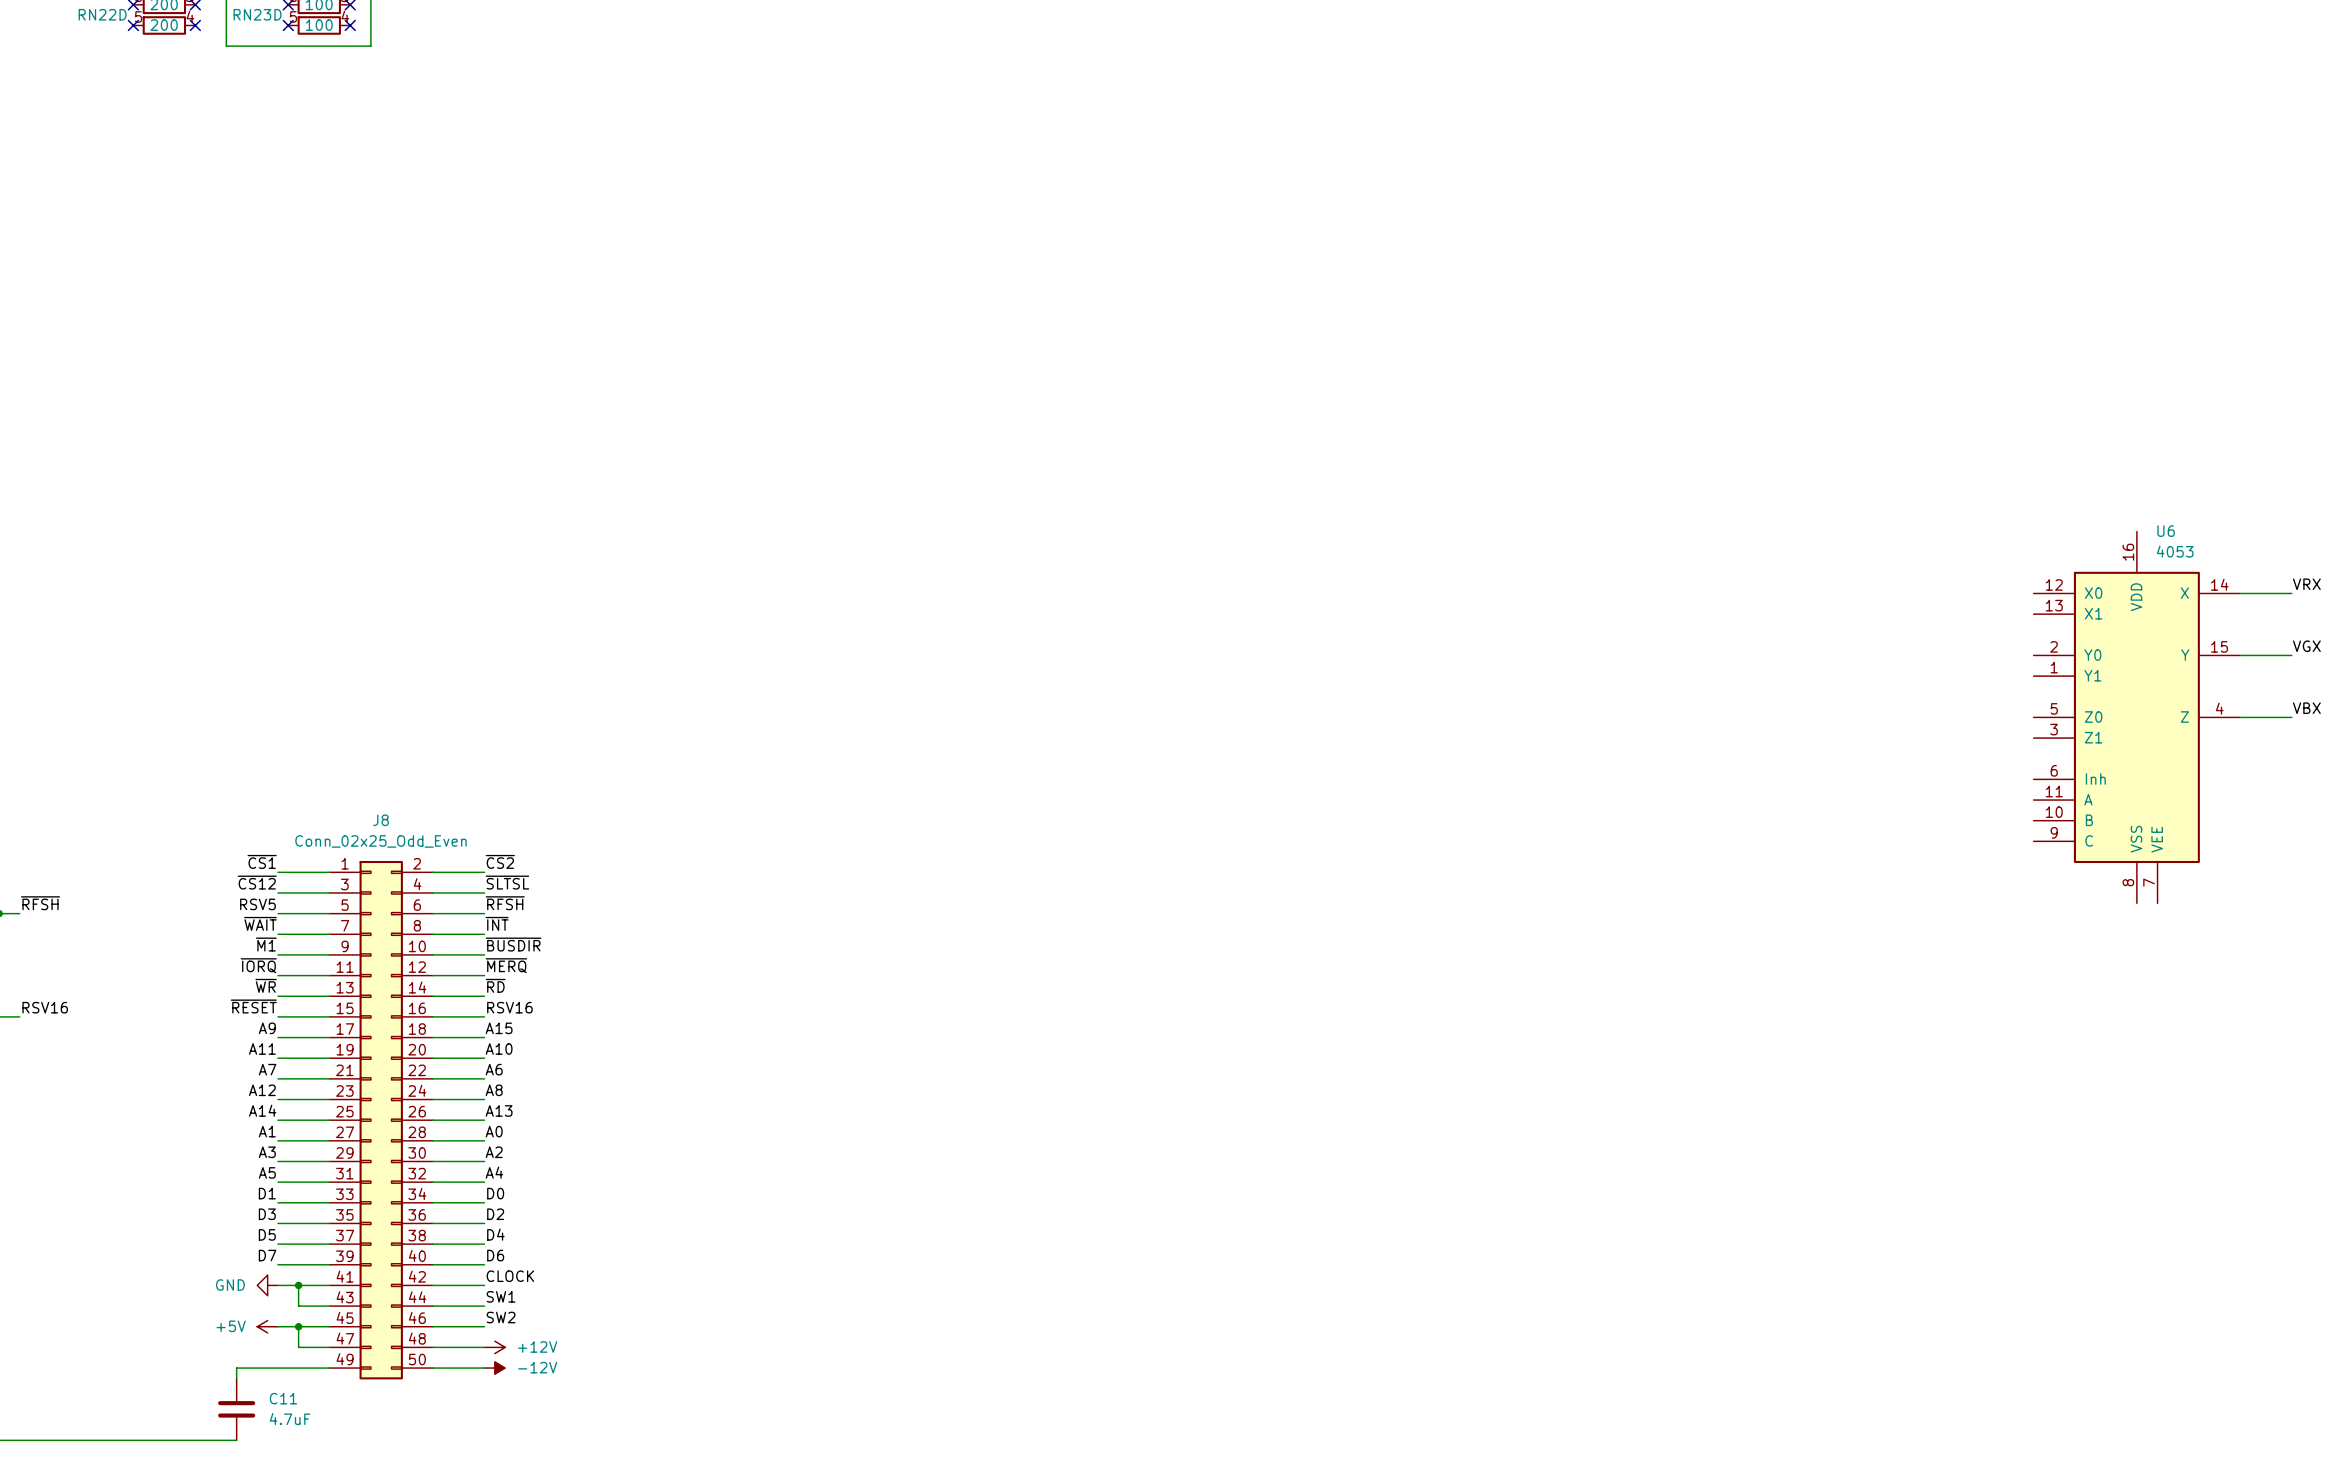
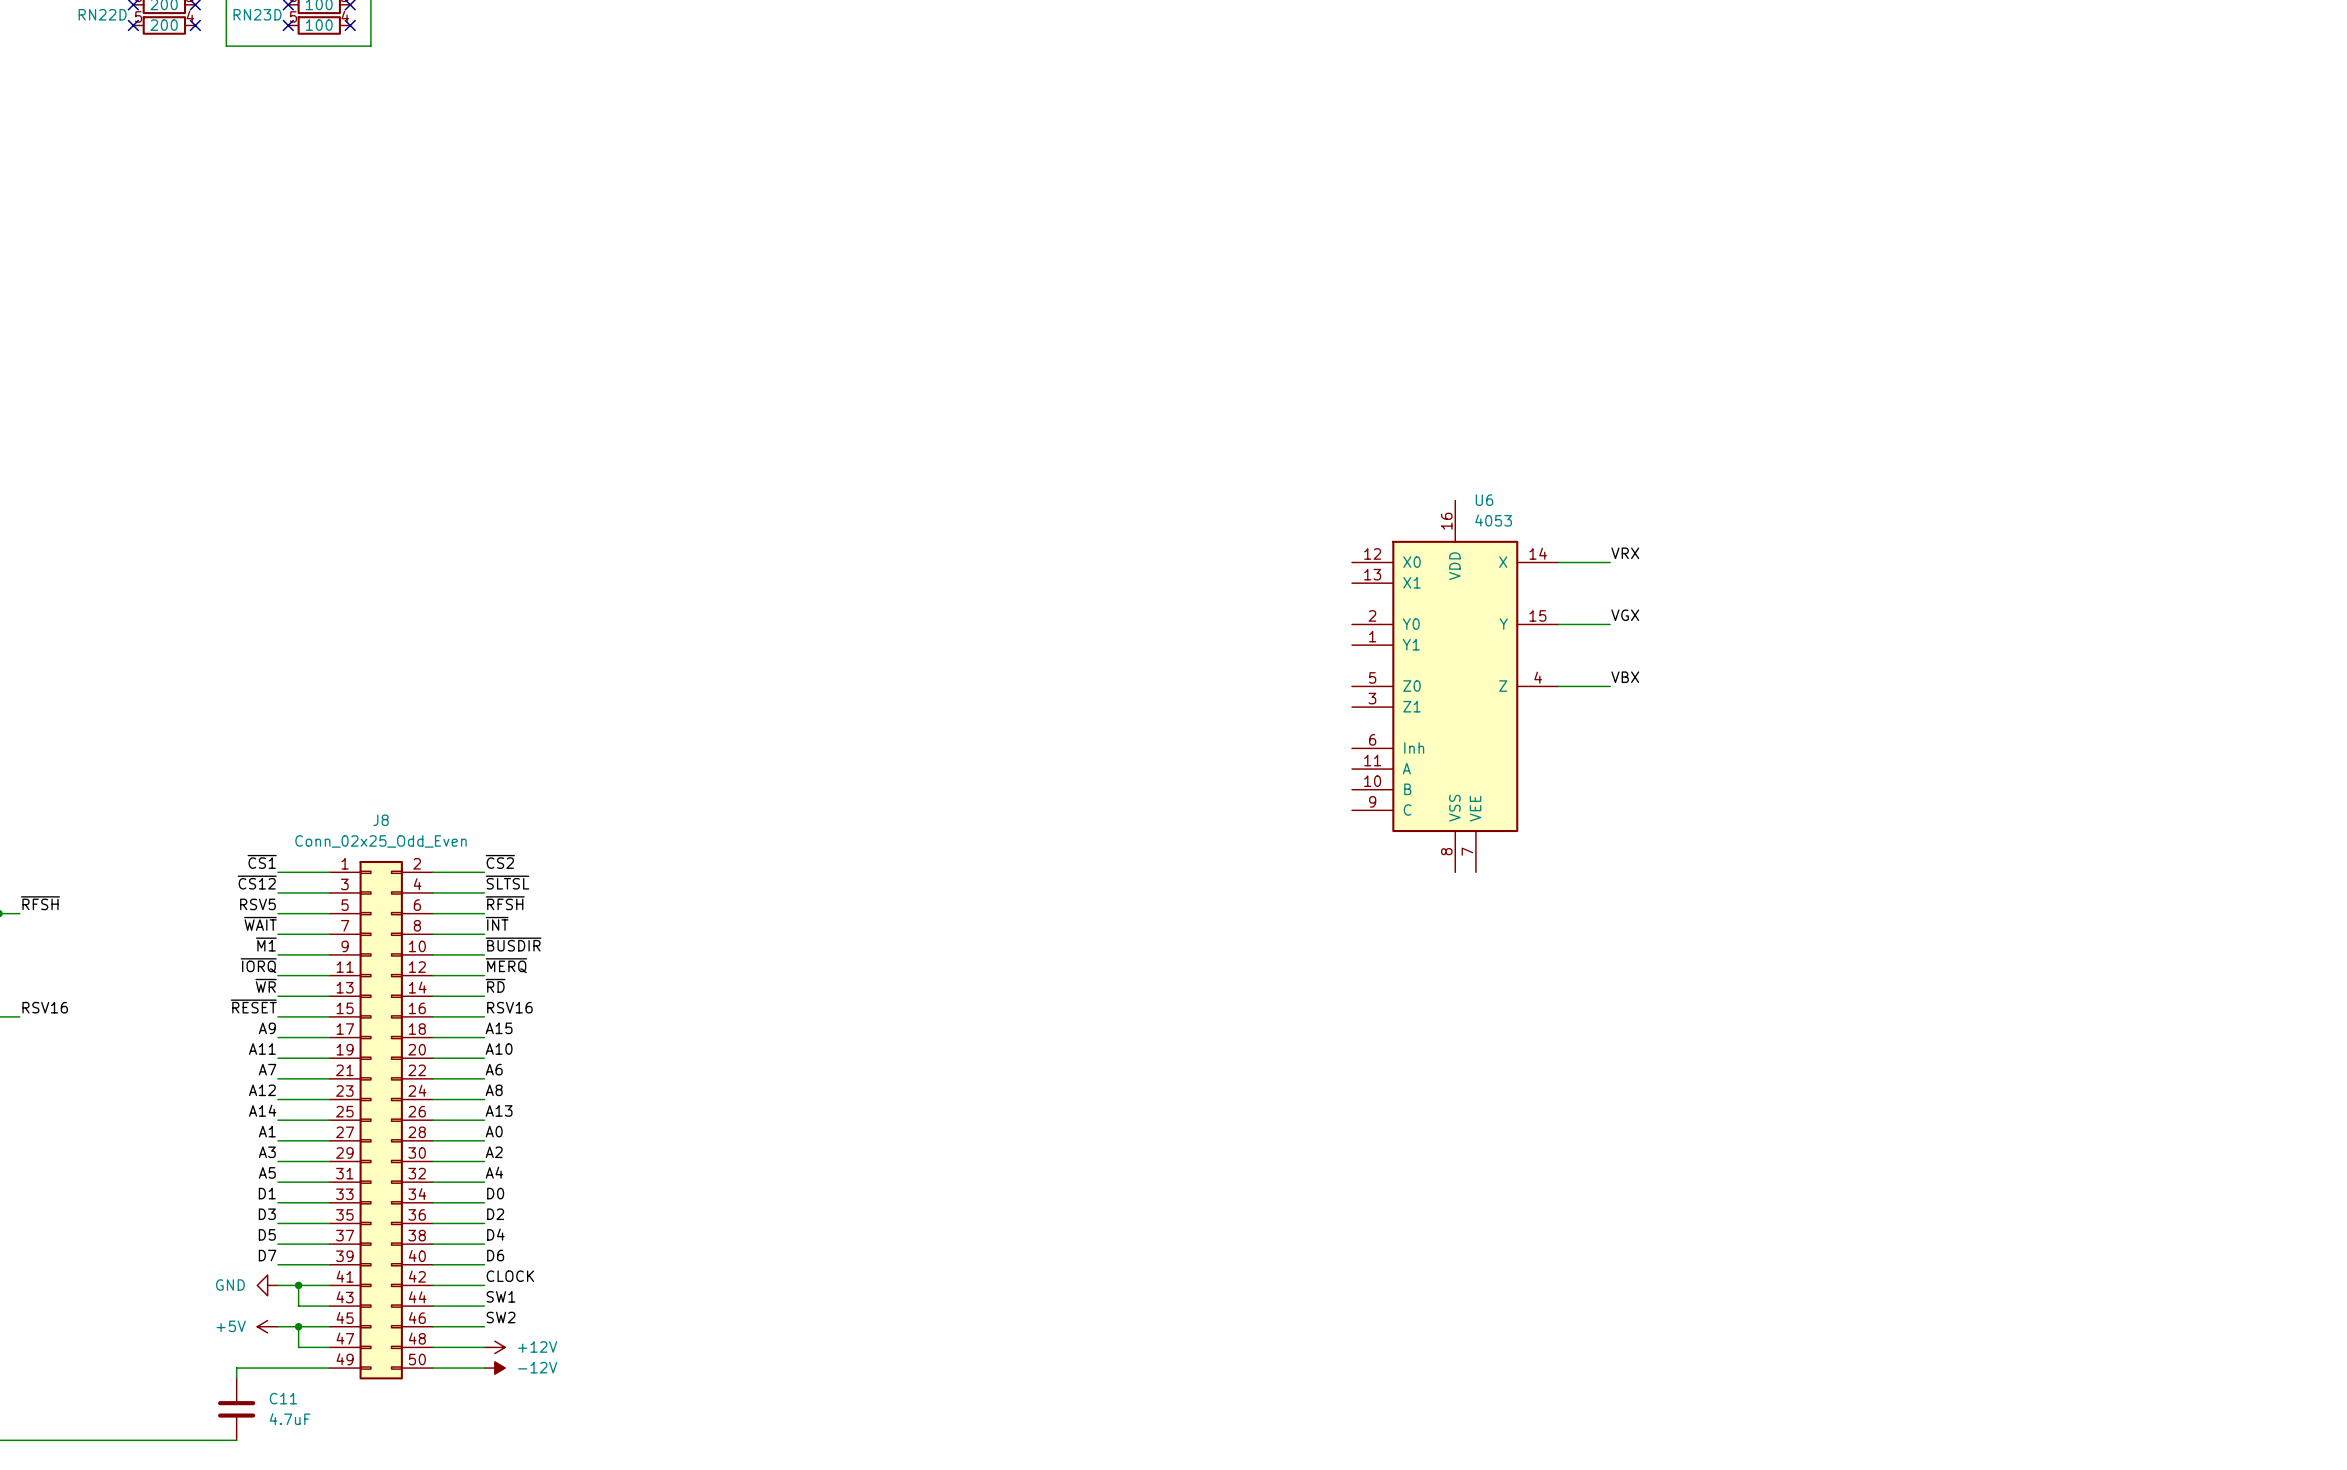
label: none -> VRX (1625, 553)
wire: none -> (1558, 562) (1610, 562)
label: VRX (2306, 584) -> none
wire: (2240, 593) (2291, 593) -> none
label: none -> VGX (1625, 615)
wire: none -> (1558, 624) (1610, 624)
label: VGX (2306, 646) -> none
wire: (2240, 655) (2291, 655) -> none
label: none -> VBX (1625, 677)
wire: none -> (1558, 686) (1610, 686)
label: VBX (2306, 708) -> none
U6 position: (2136, 717) -> (1455, 686)
wire: (2240, 717) (2291, 717) -> none

